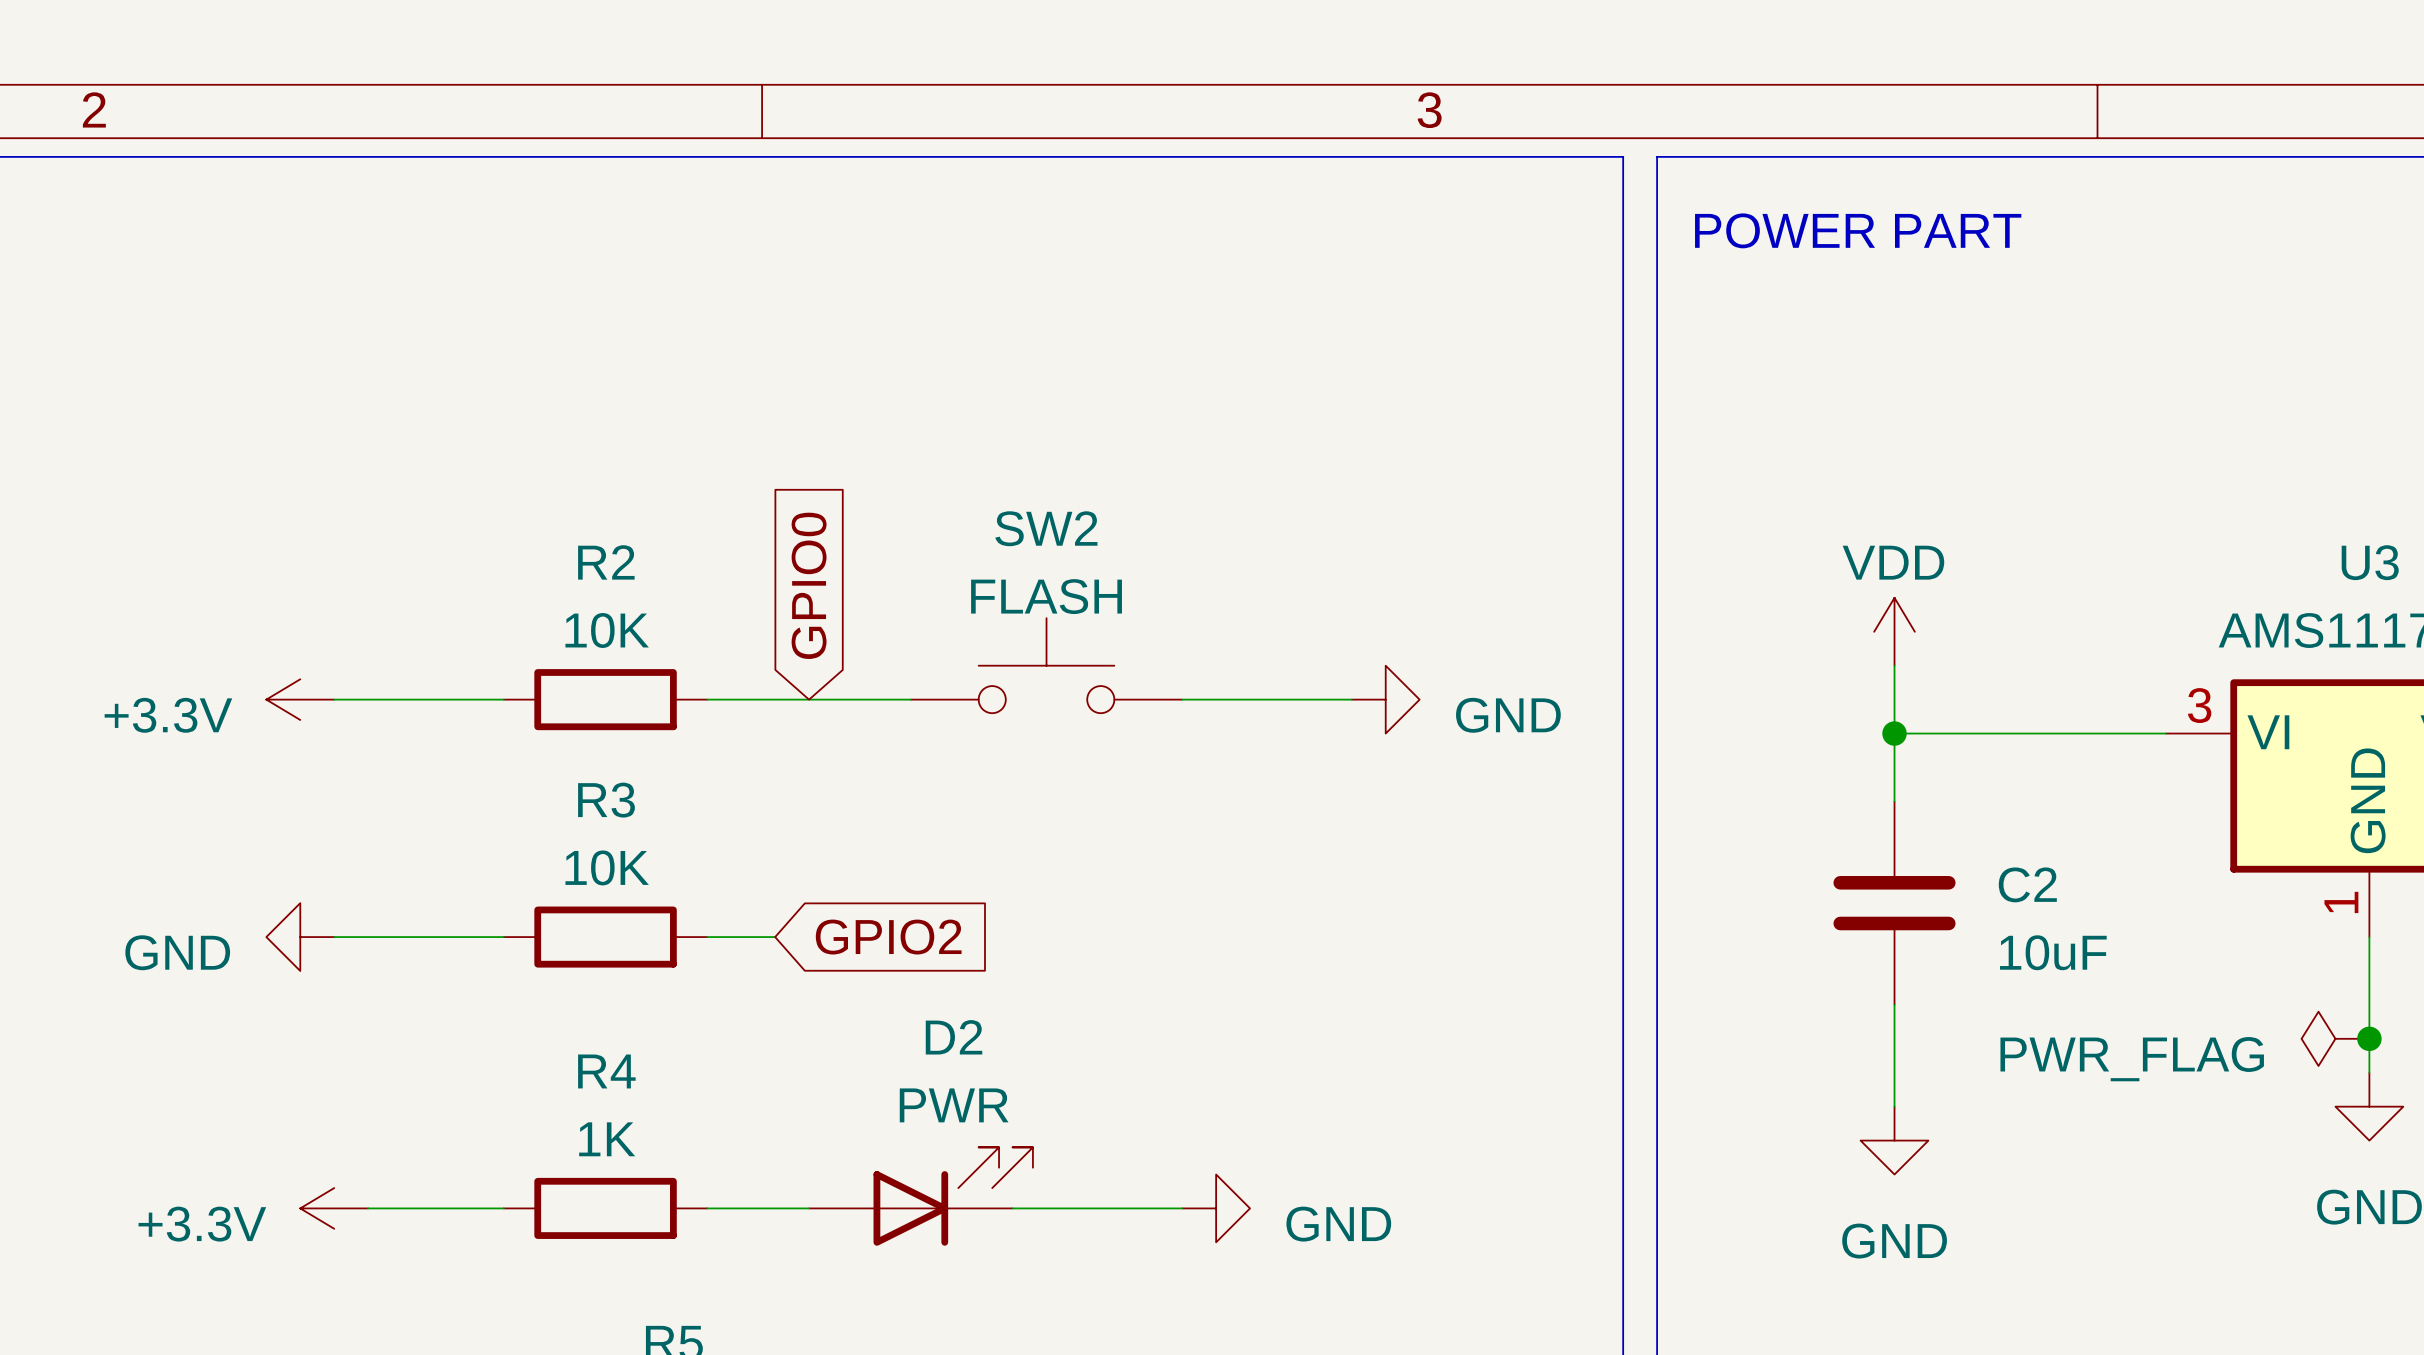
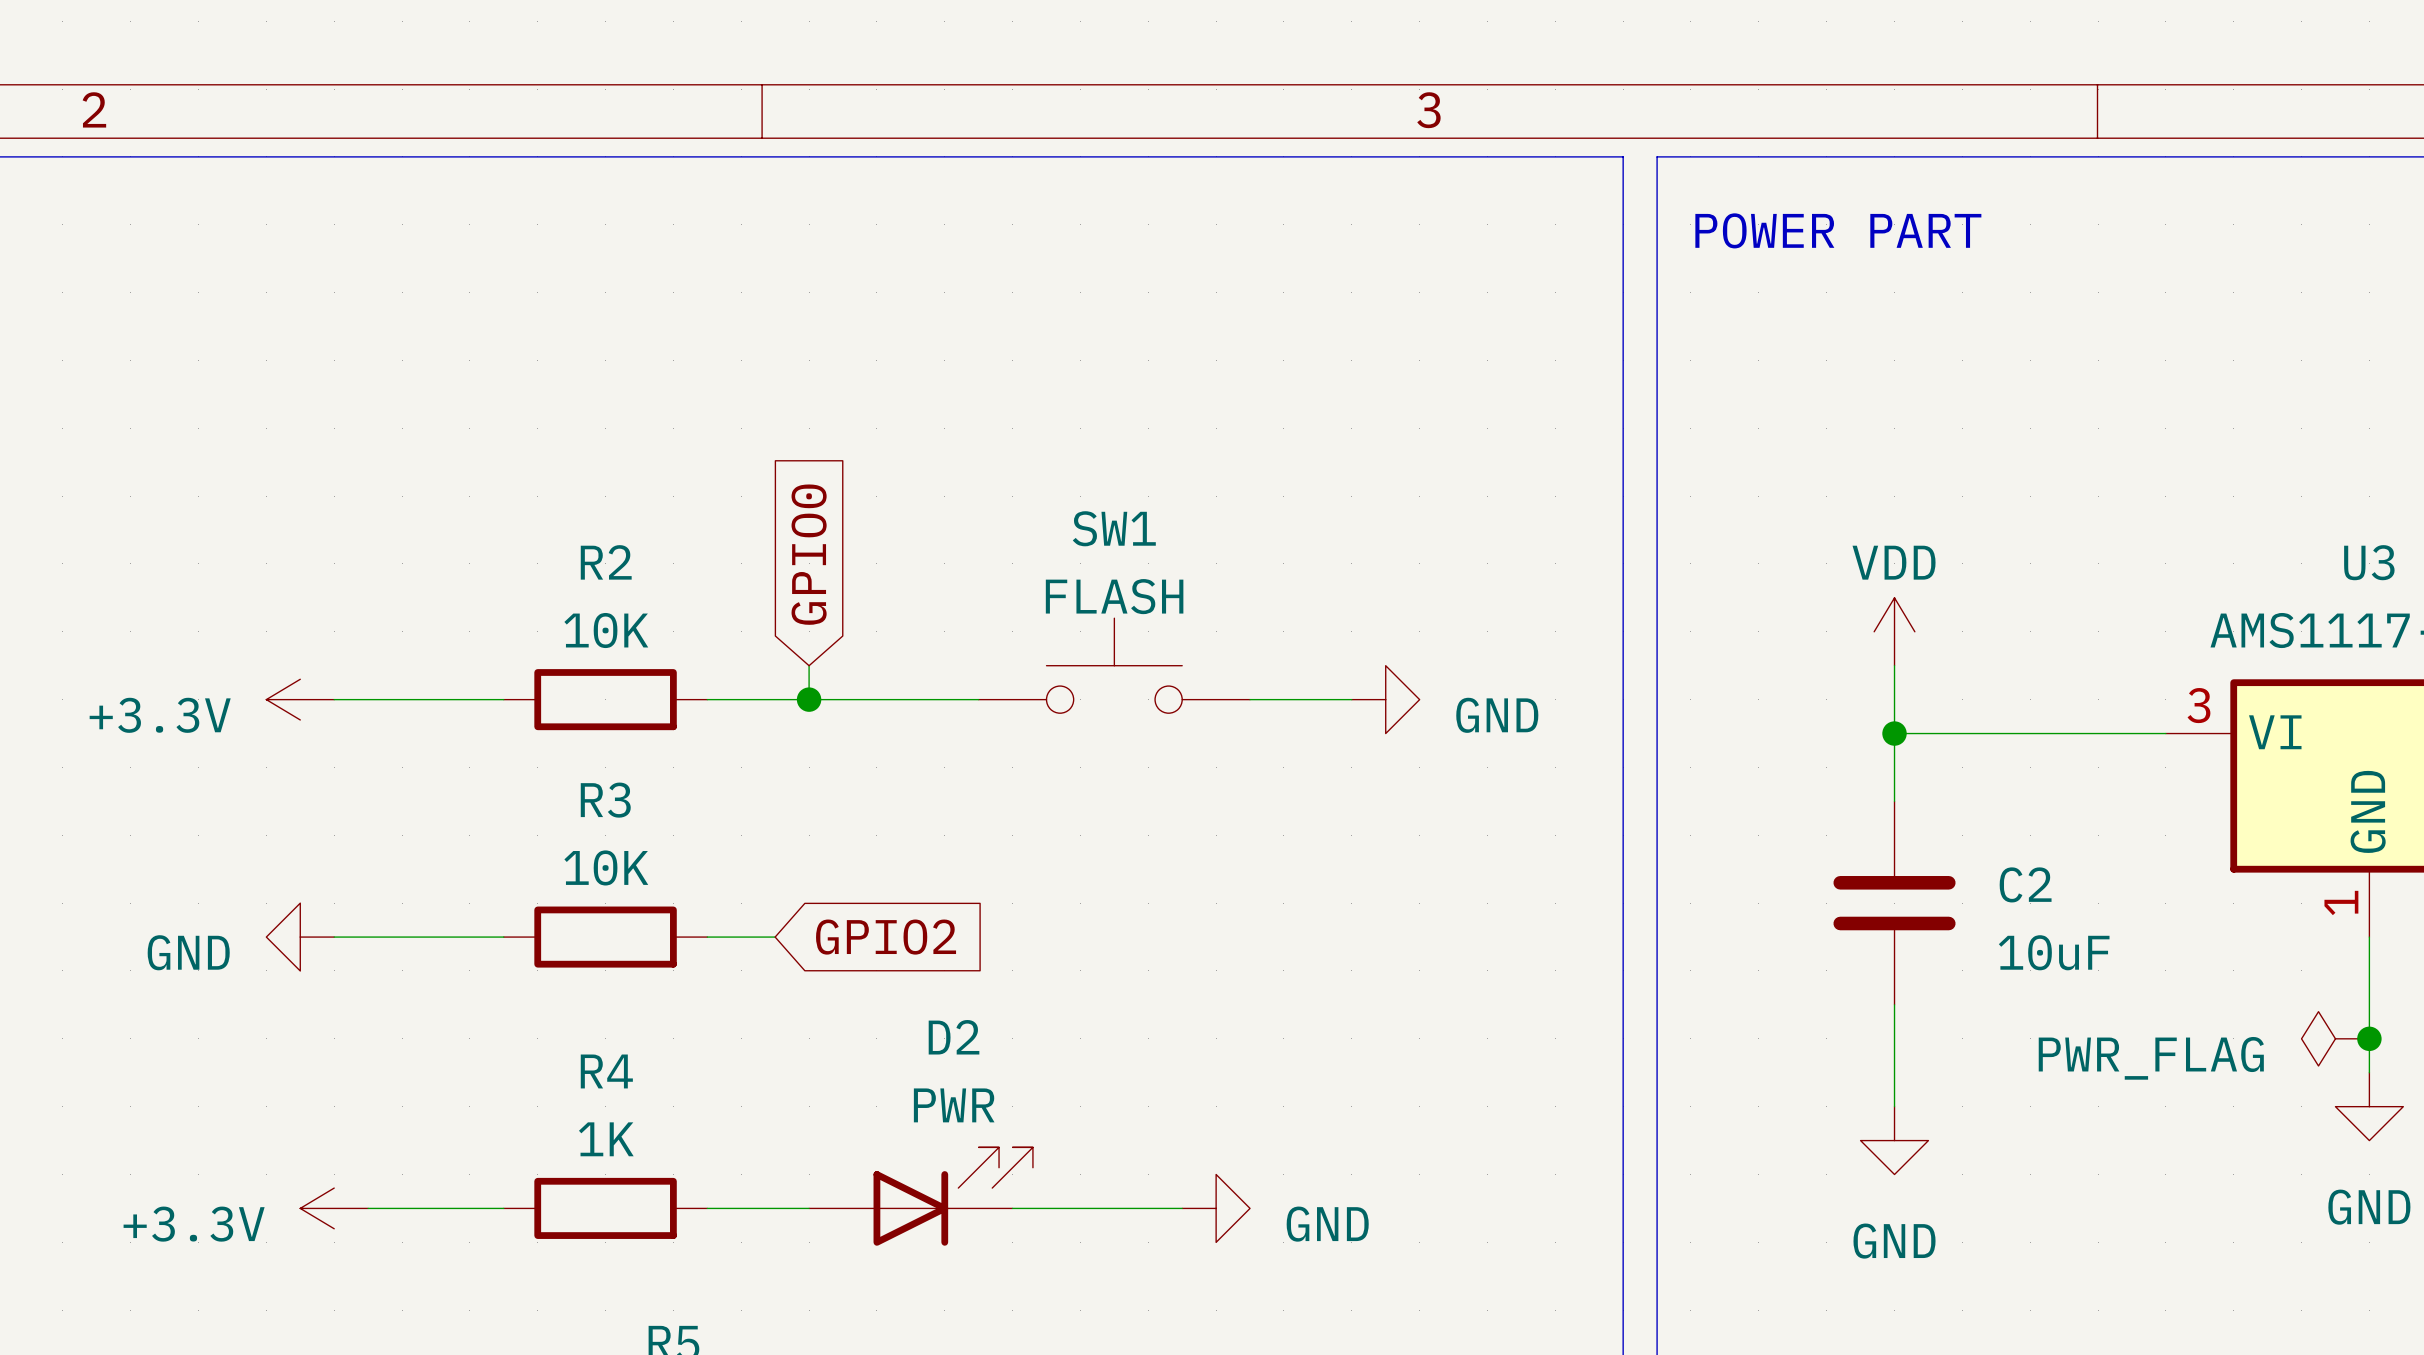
global label position: GPIO0 (809, 585) -> GPIO0 (809, 554)
wire: none -> (809, 665) (809, 699)
SW2: FLASH (1046, 665) -> none
SW1: none -> FLASH (1114, 665)
junction: none -> (809, 699)

